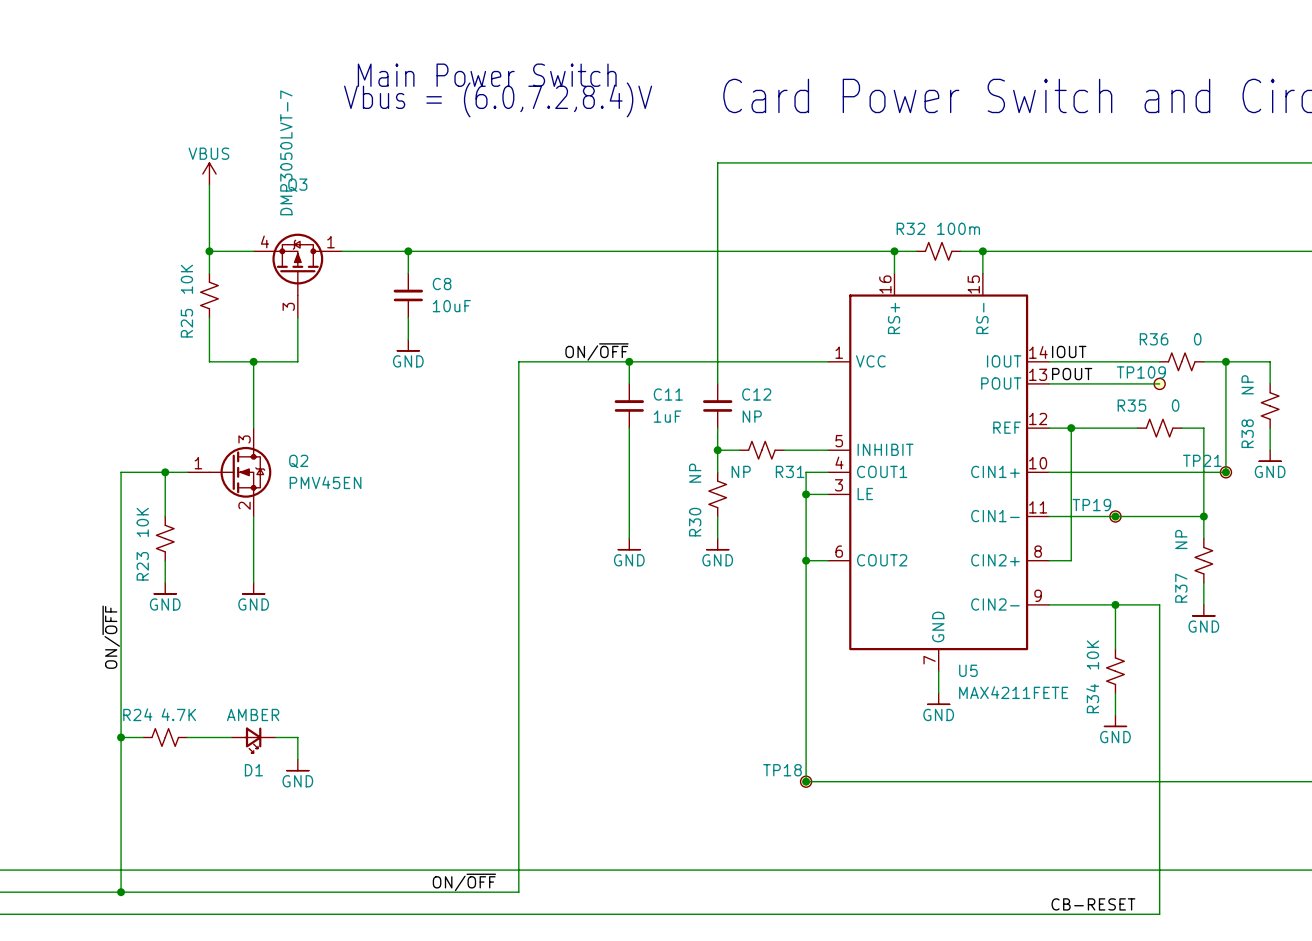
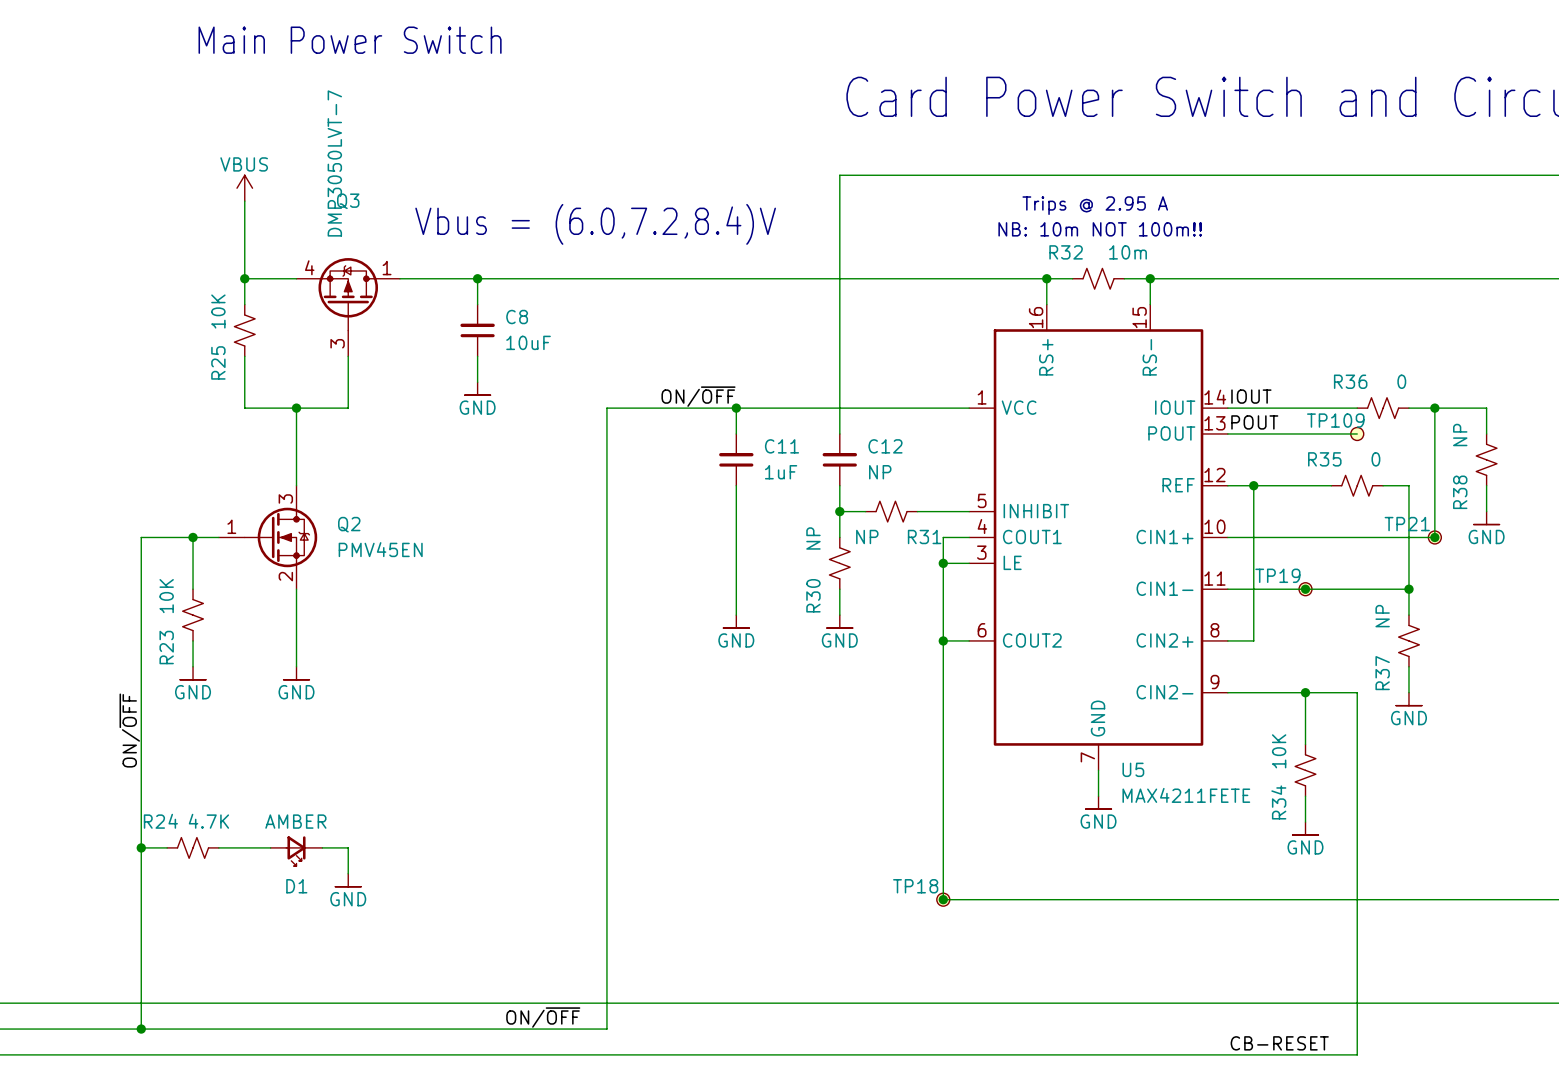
text position: Main Power Switch (487, 75) -> Main Power Switch (350, 40)
text position: Vbus = (6.0,7.2,8.4)V (498, 99) -> Vbus = (6.0,7.2,8.4)V (595, 224)
text: none -> Trips @ 2.95 A (1095, 205)
text: none -> NB: 10m NOT 100m!! (1100, 229)
R32 value: 100m (958, 228) -> 10m (1128, 252)

